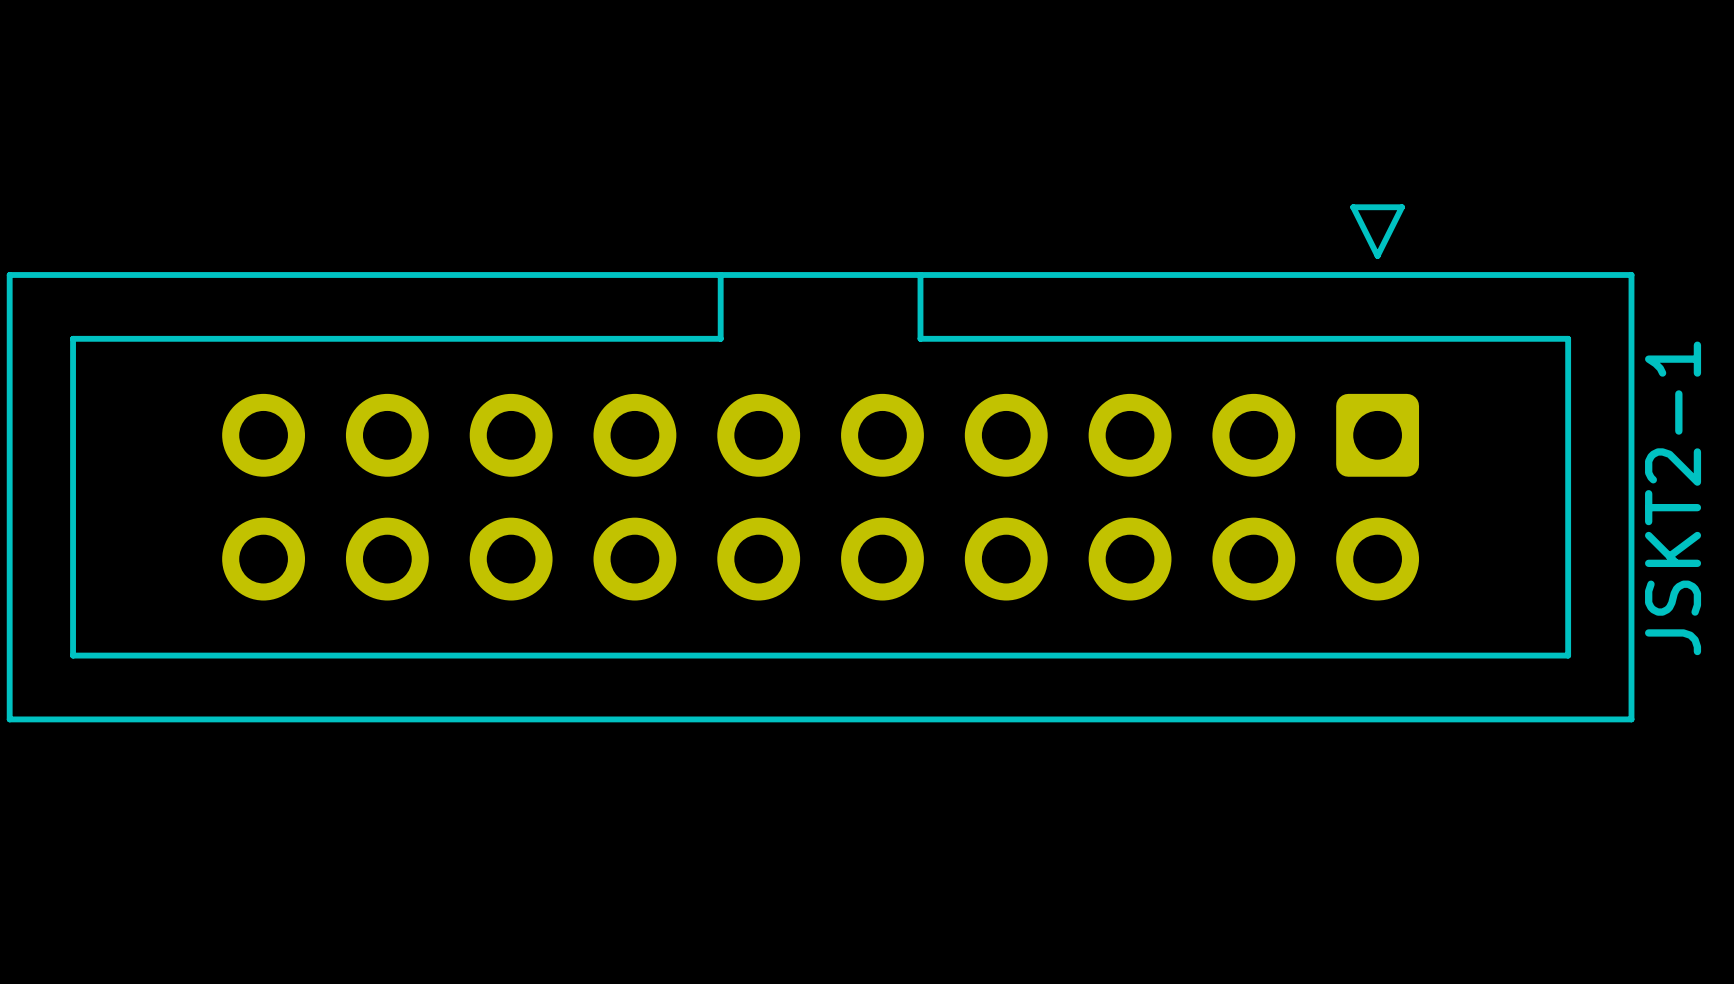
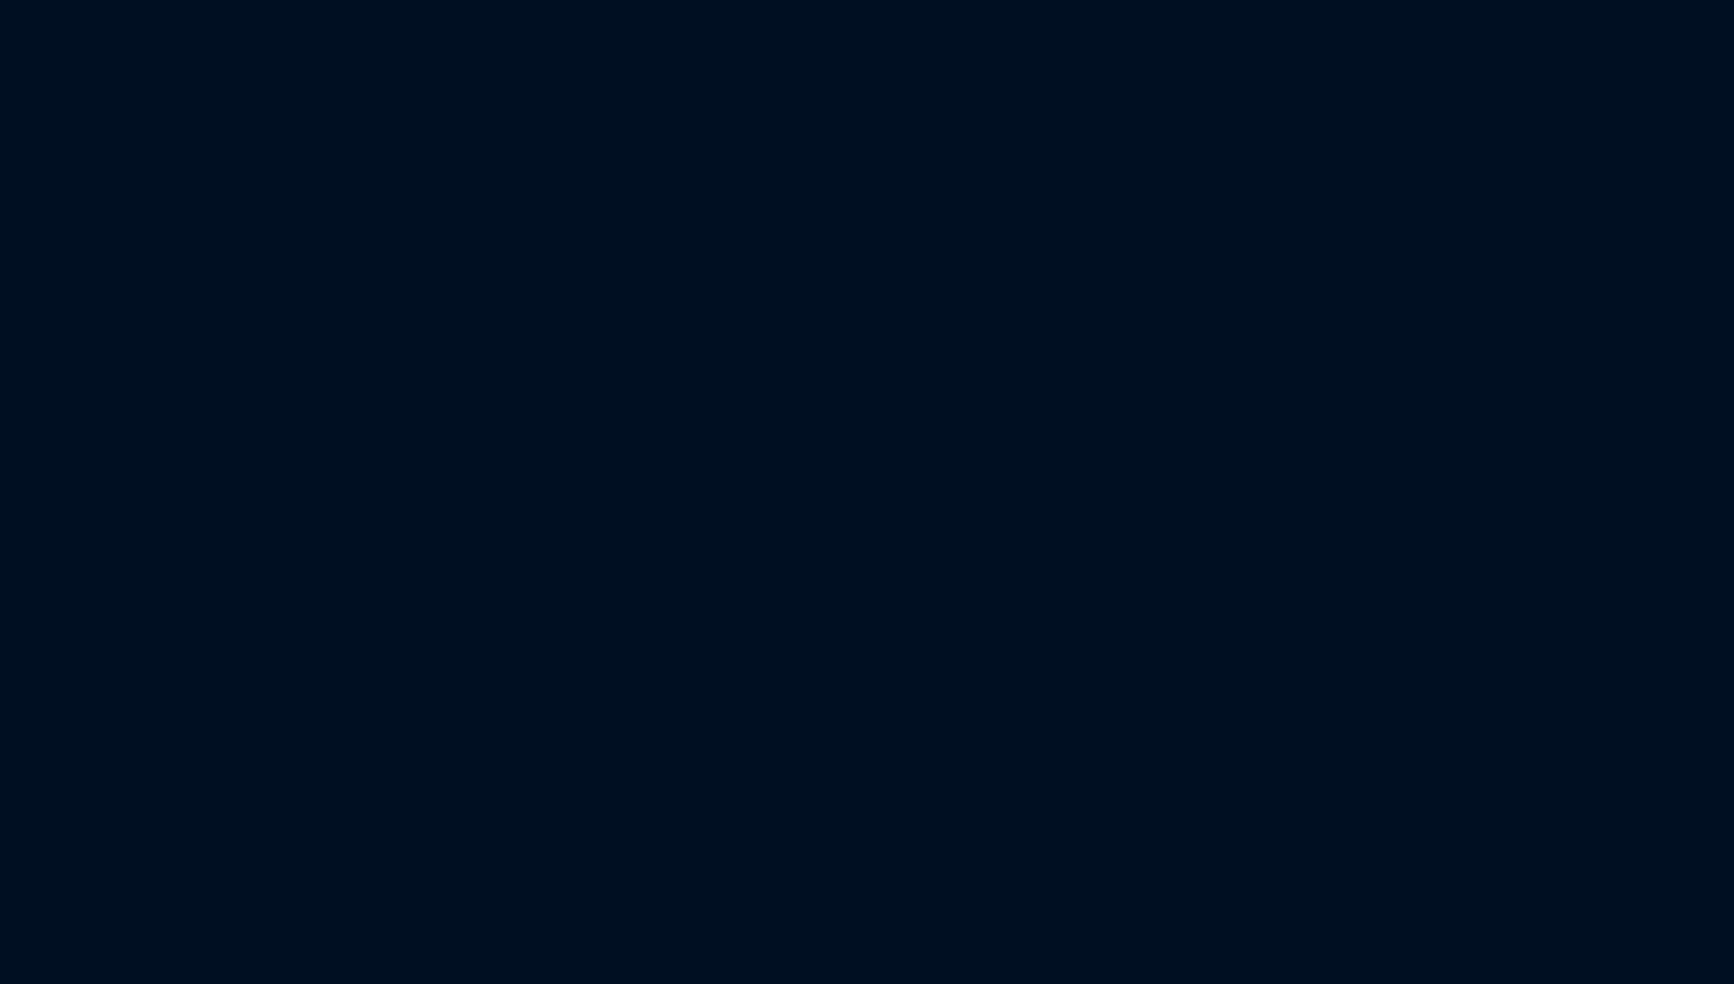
JSKT2-1: (820, 463) -> none

